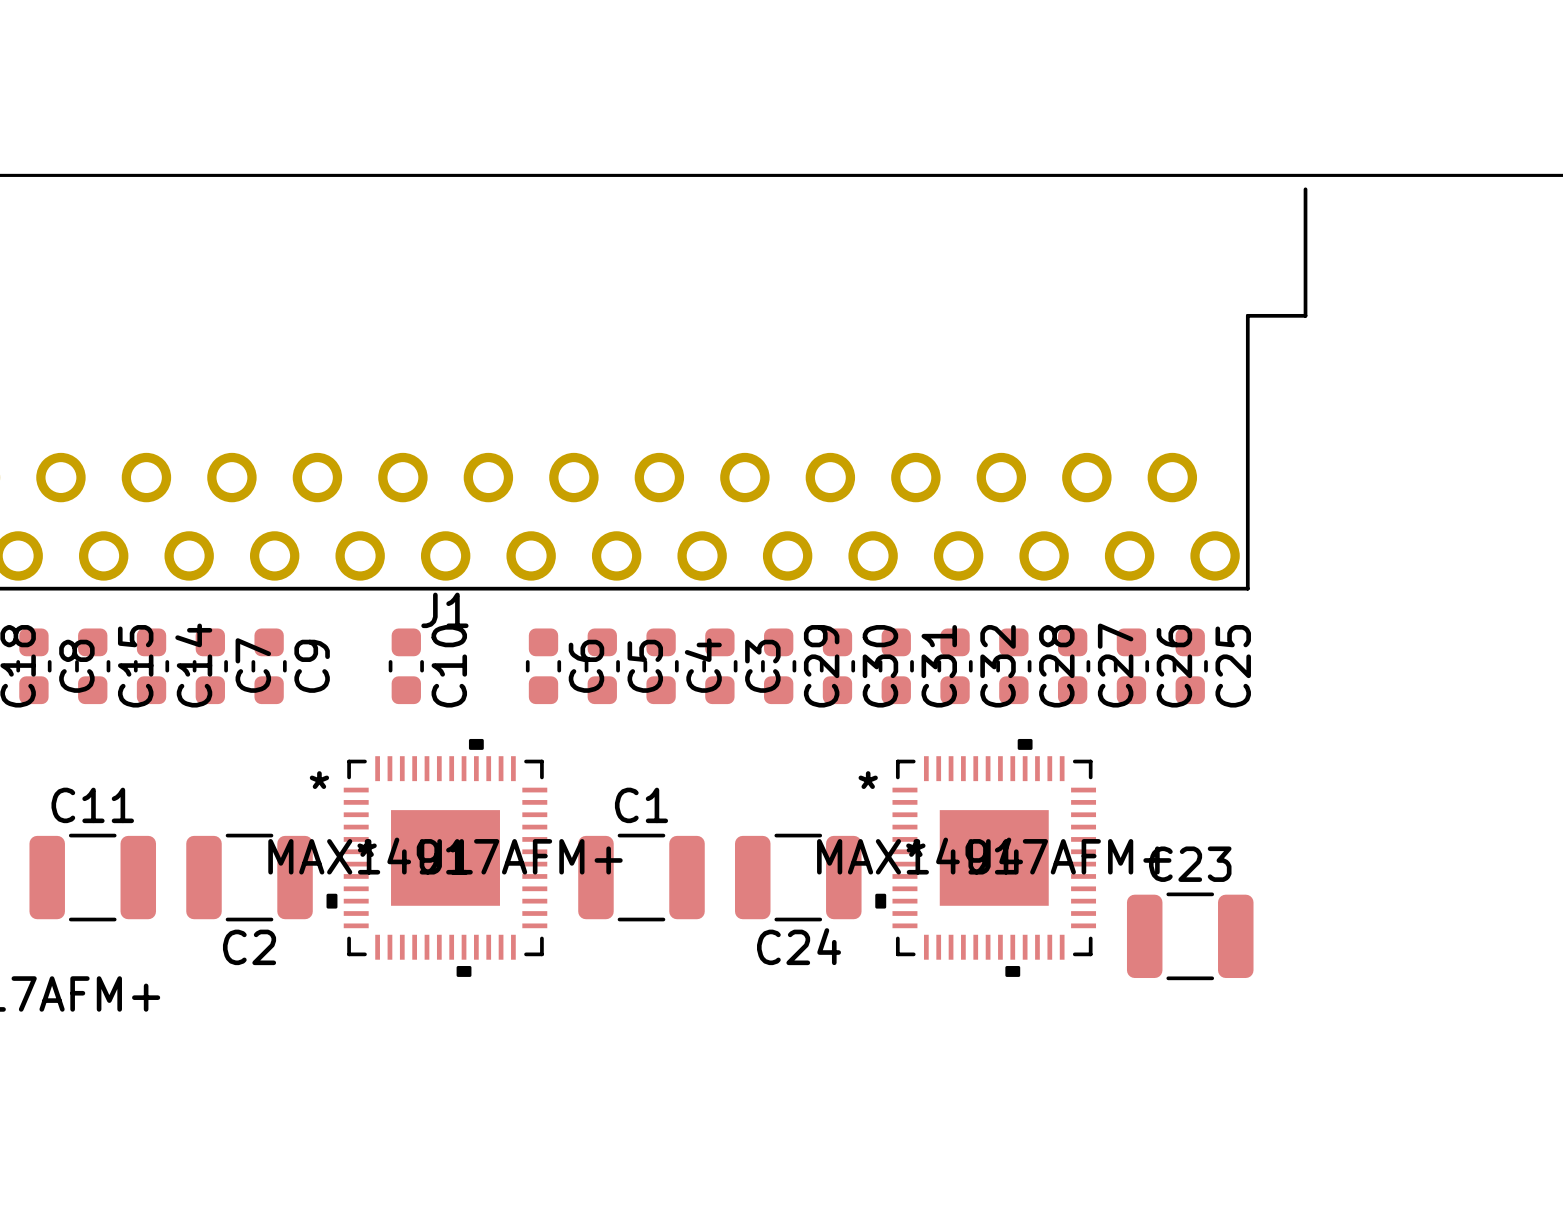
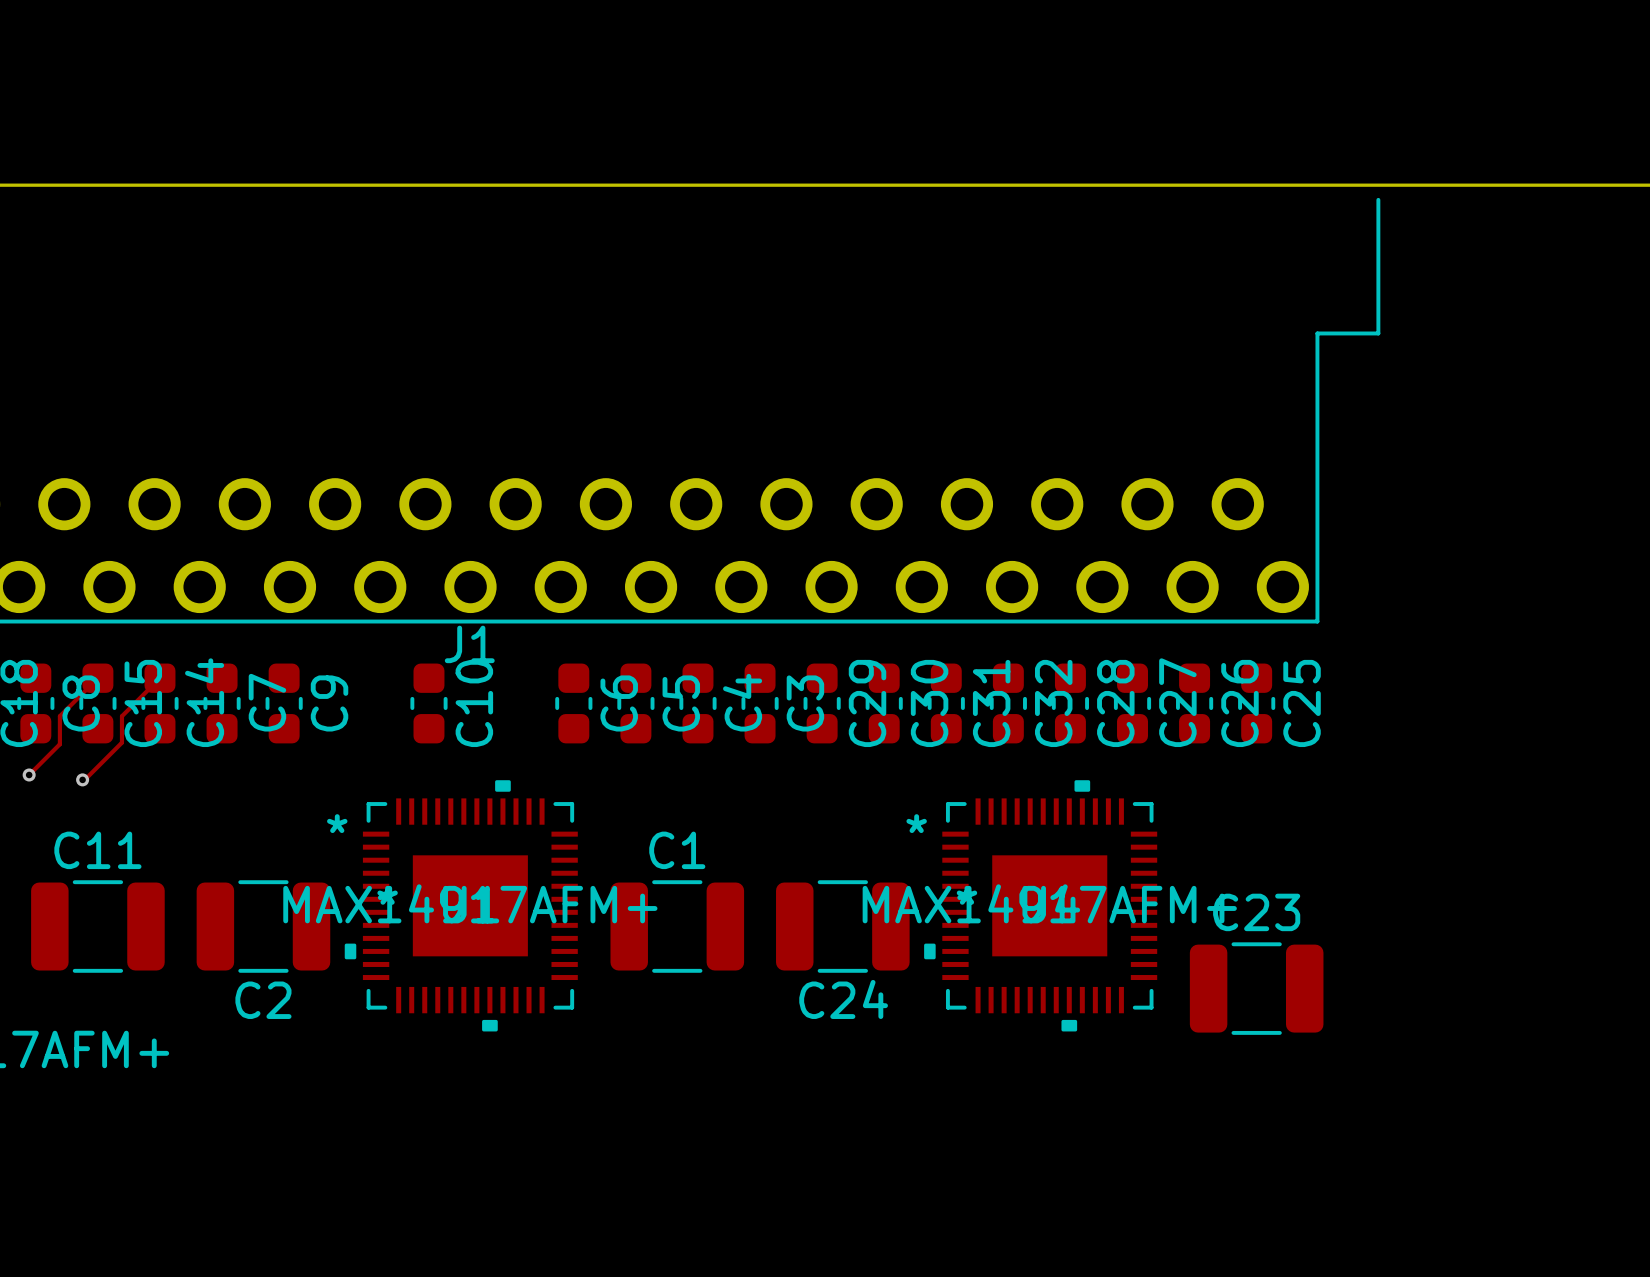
track: none -> (97, 678) (59, 716) (59, 744) (29, 774)
track: none -> (159, 678) (121, 716) (121, 742) (82, 779)
via: none -> (29, 774)
via: none -> (82, 779)

